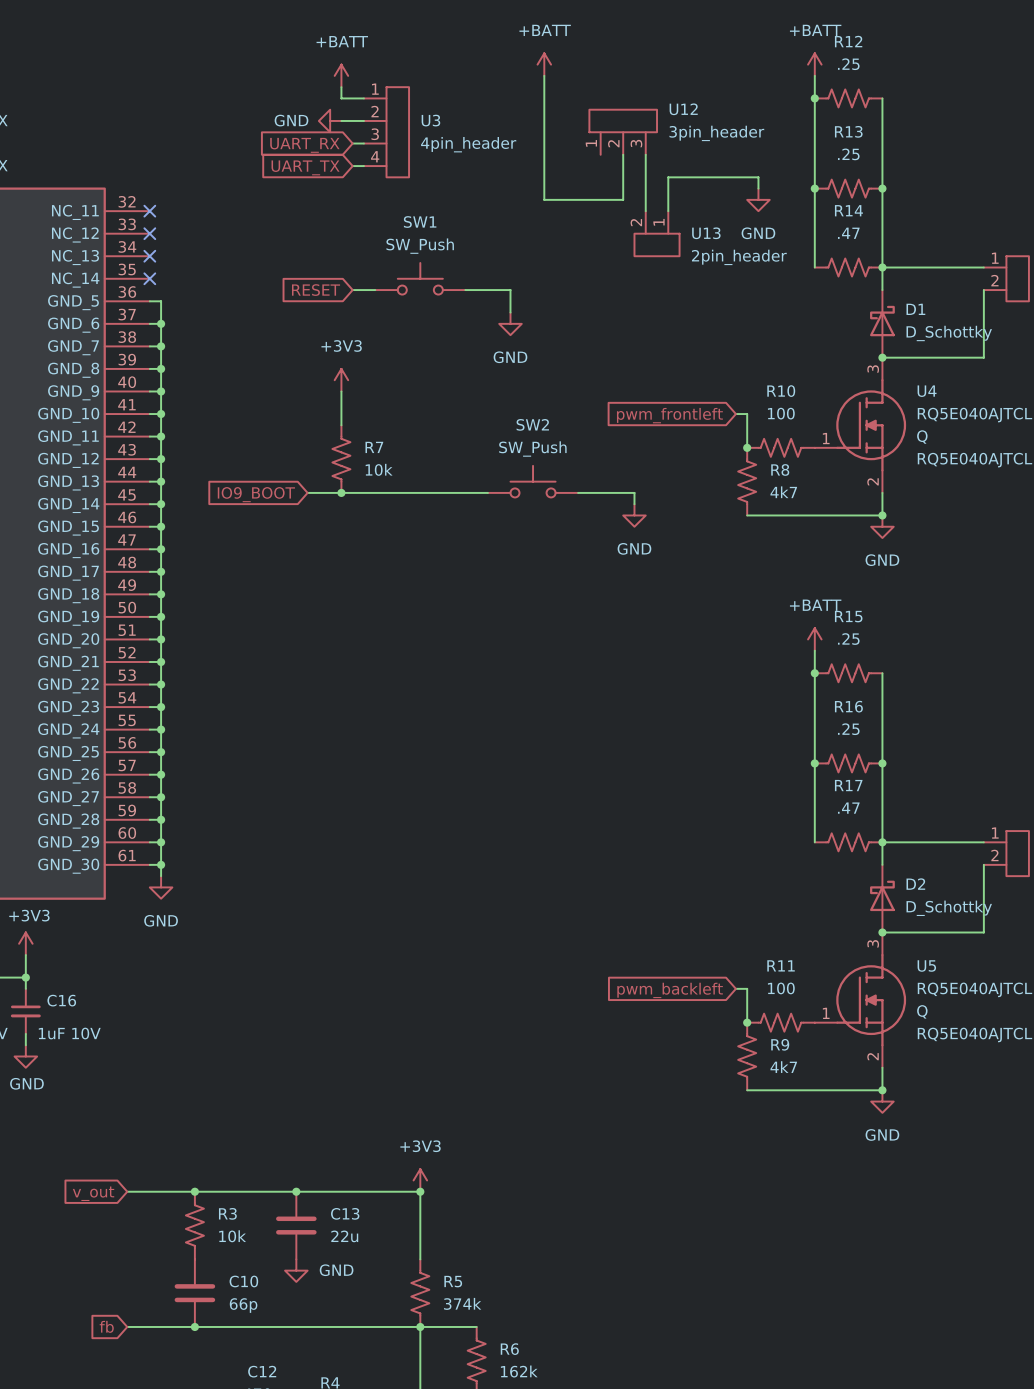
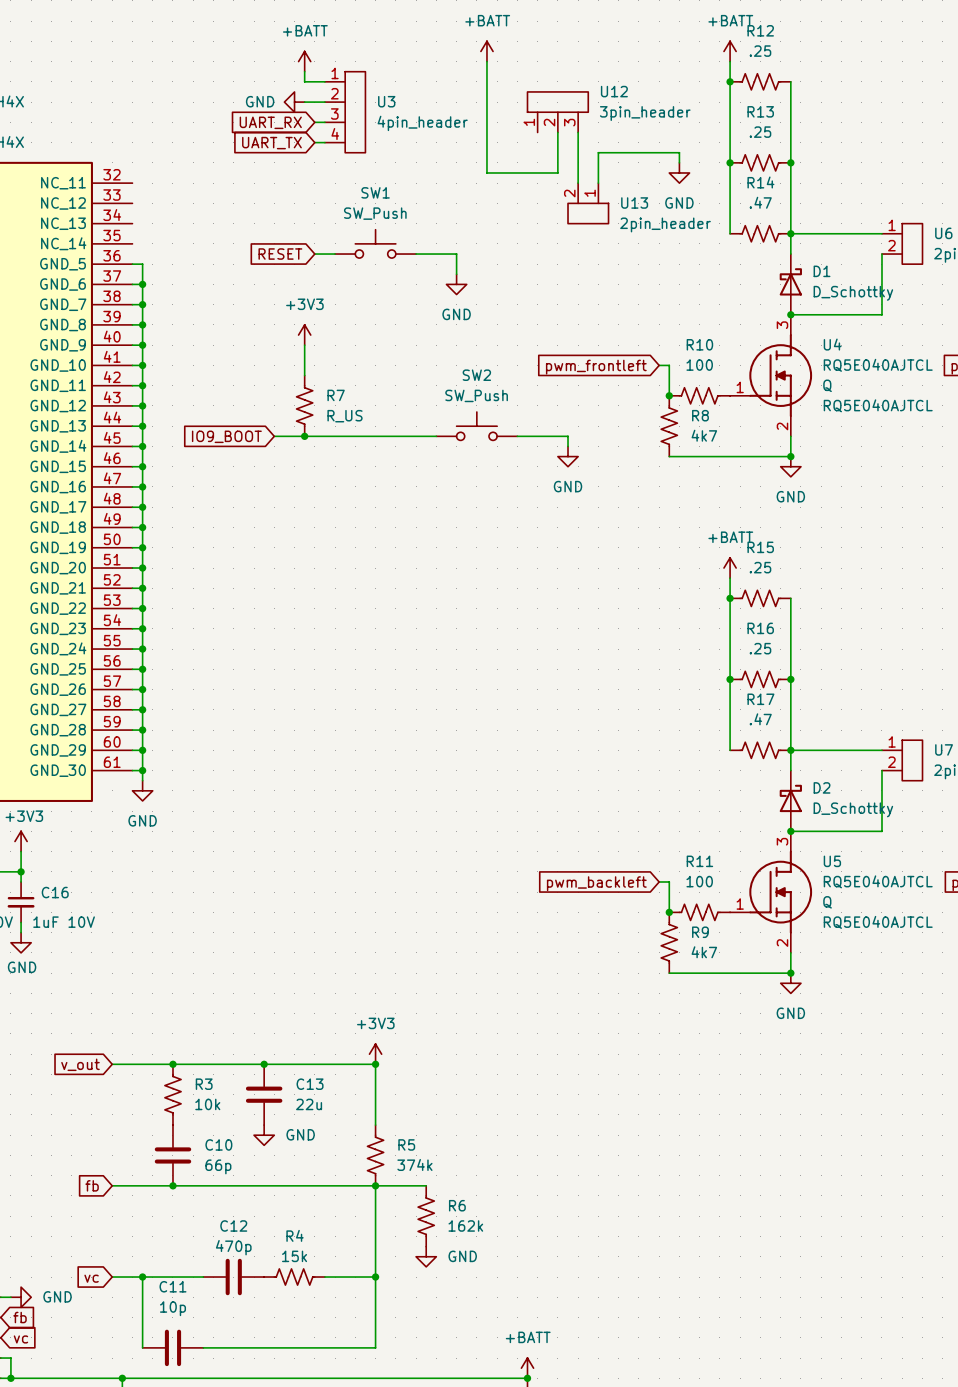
no-connect mark: (149, 211) -> none
no-connect mark: (149, 233) -> none
no-connect mark: (149, 256) -> none
no-connect mark: (149, 278) -> none
R7 value: 10k (379, 469) -> R_US (345, 416)

